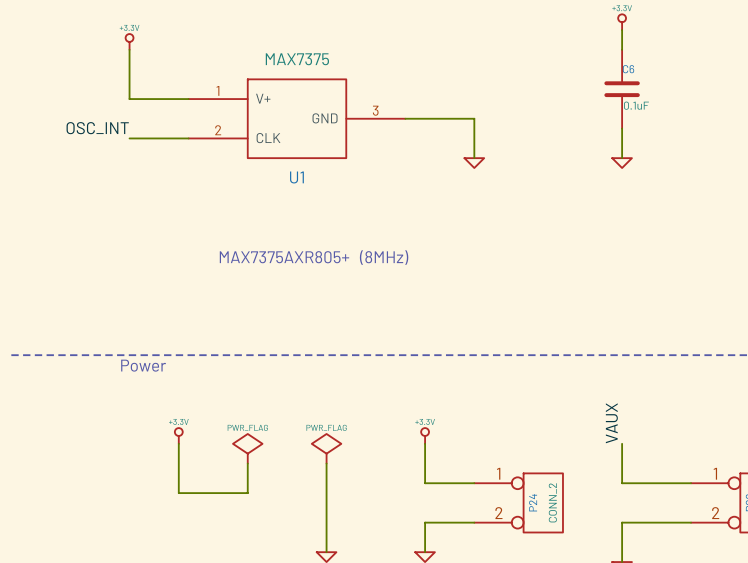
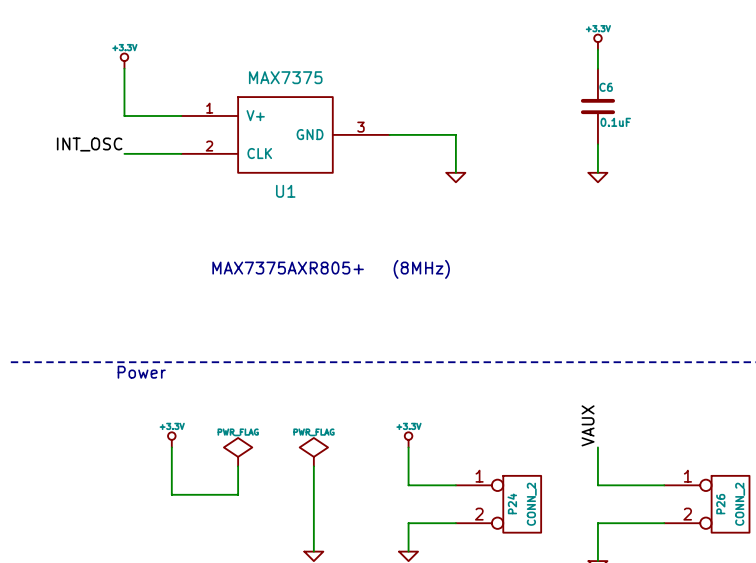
label: OSC_INT (97, 128) -> INT_OSC (89, 144)

